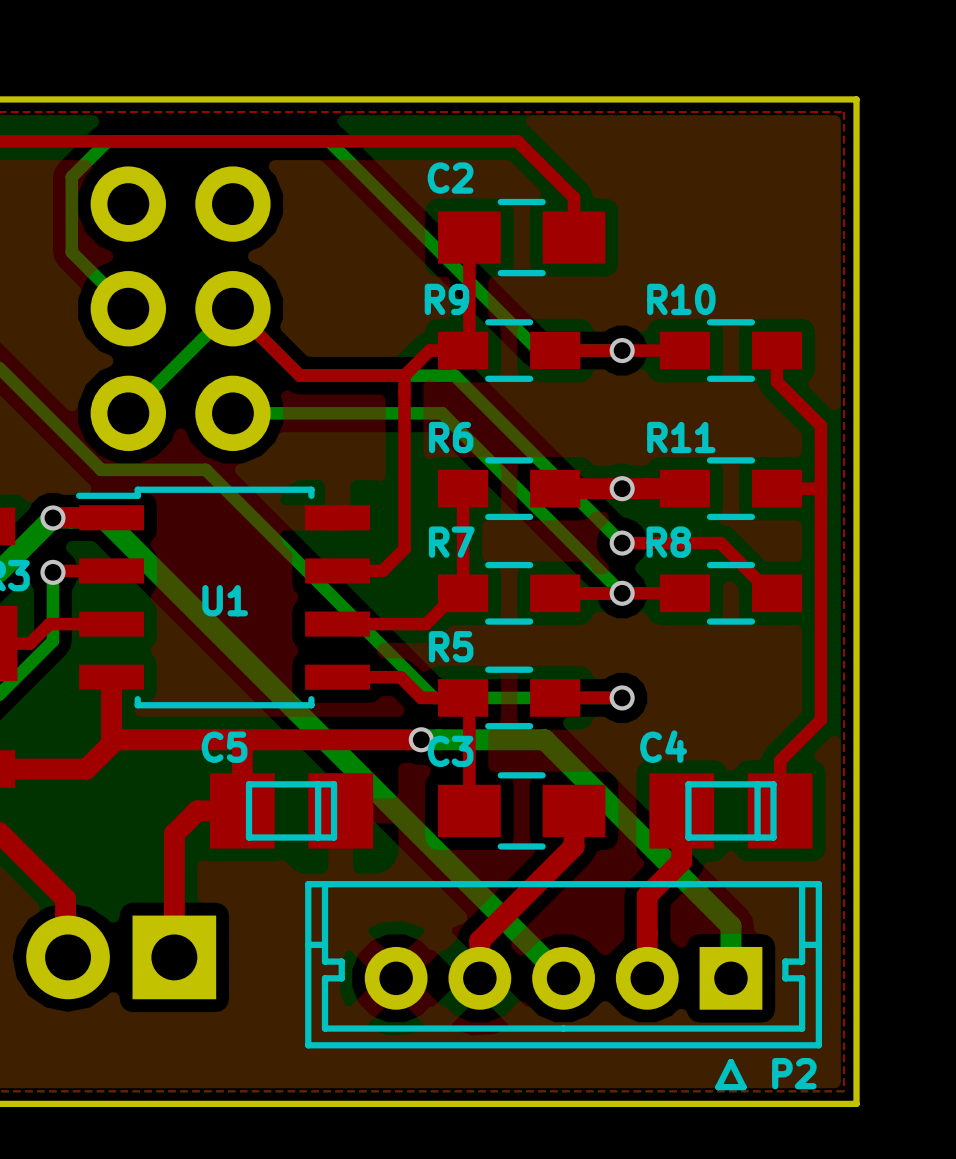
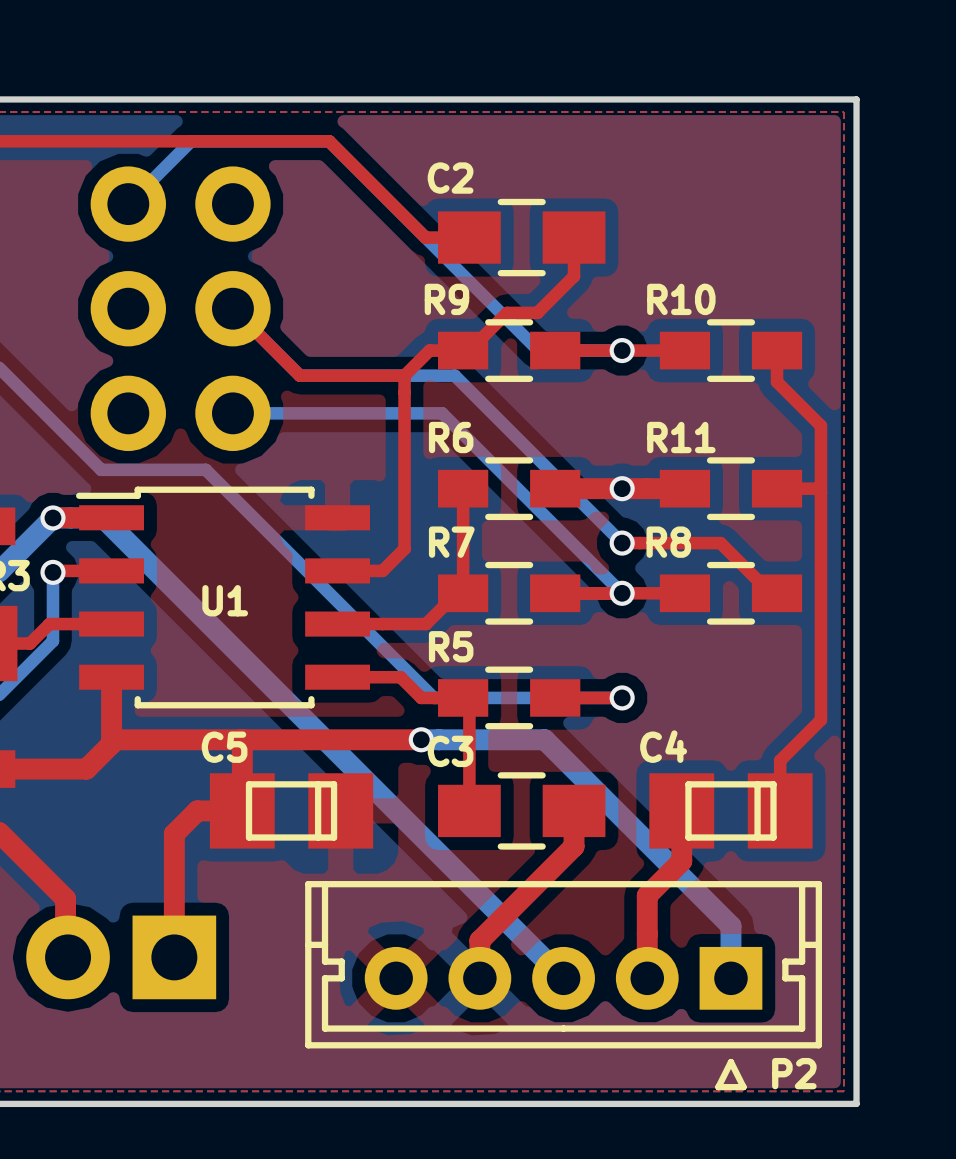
bottom track: (191, 141) (107, 141) (71, 176) (71, 252) (128, 308) -> (191, 141) (128, 204)
top track: (329, 141) (517, 141) (574, 197) (574, 237) -> (329, 141) (425, 237) (469, 237)
top track: (469, 237) (469, 344) (463, 350) -> none
top track: none -> (574, 237) (574, 276) (537, 312) (507, 312) (469, 350)
bottom track: (232, 308) (128, 413) -> none

